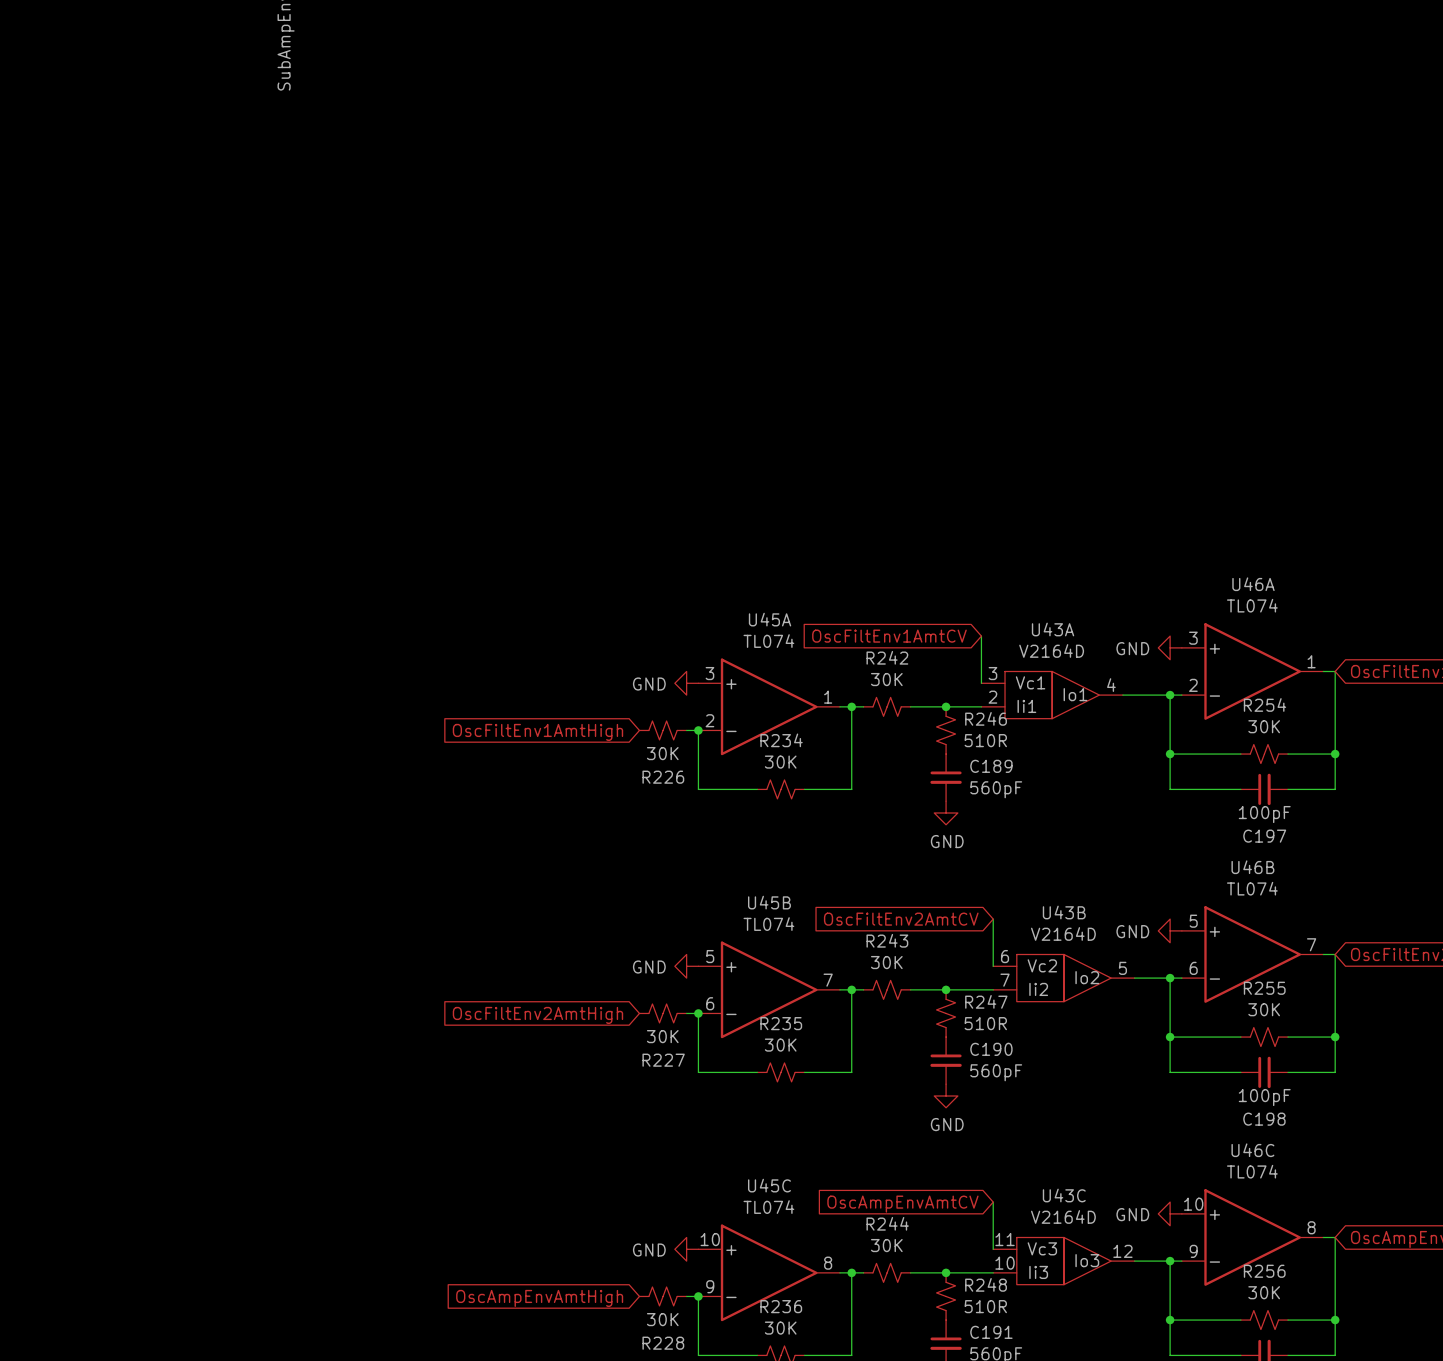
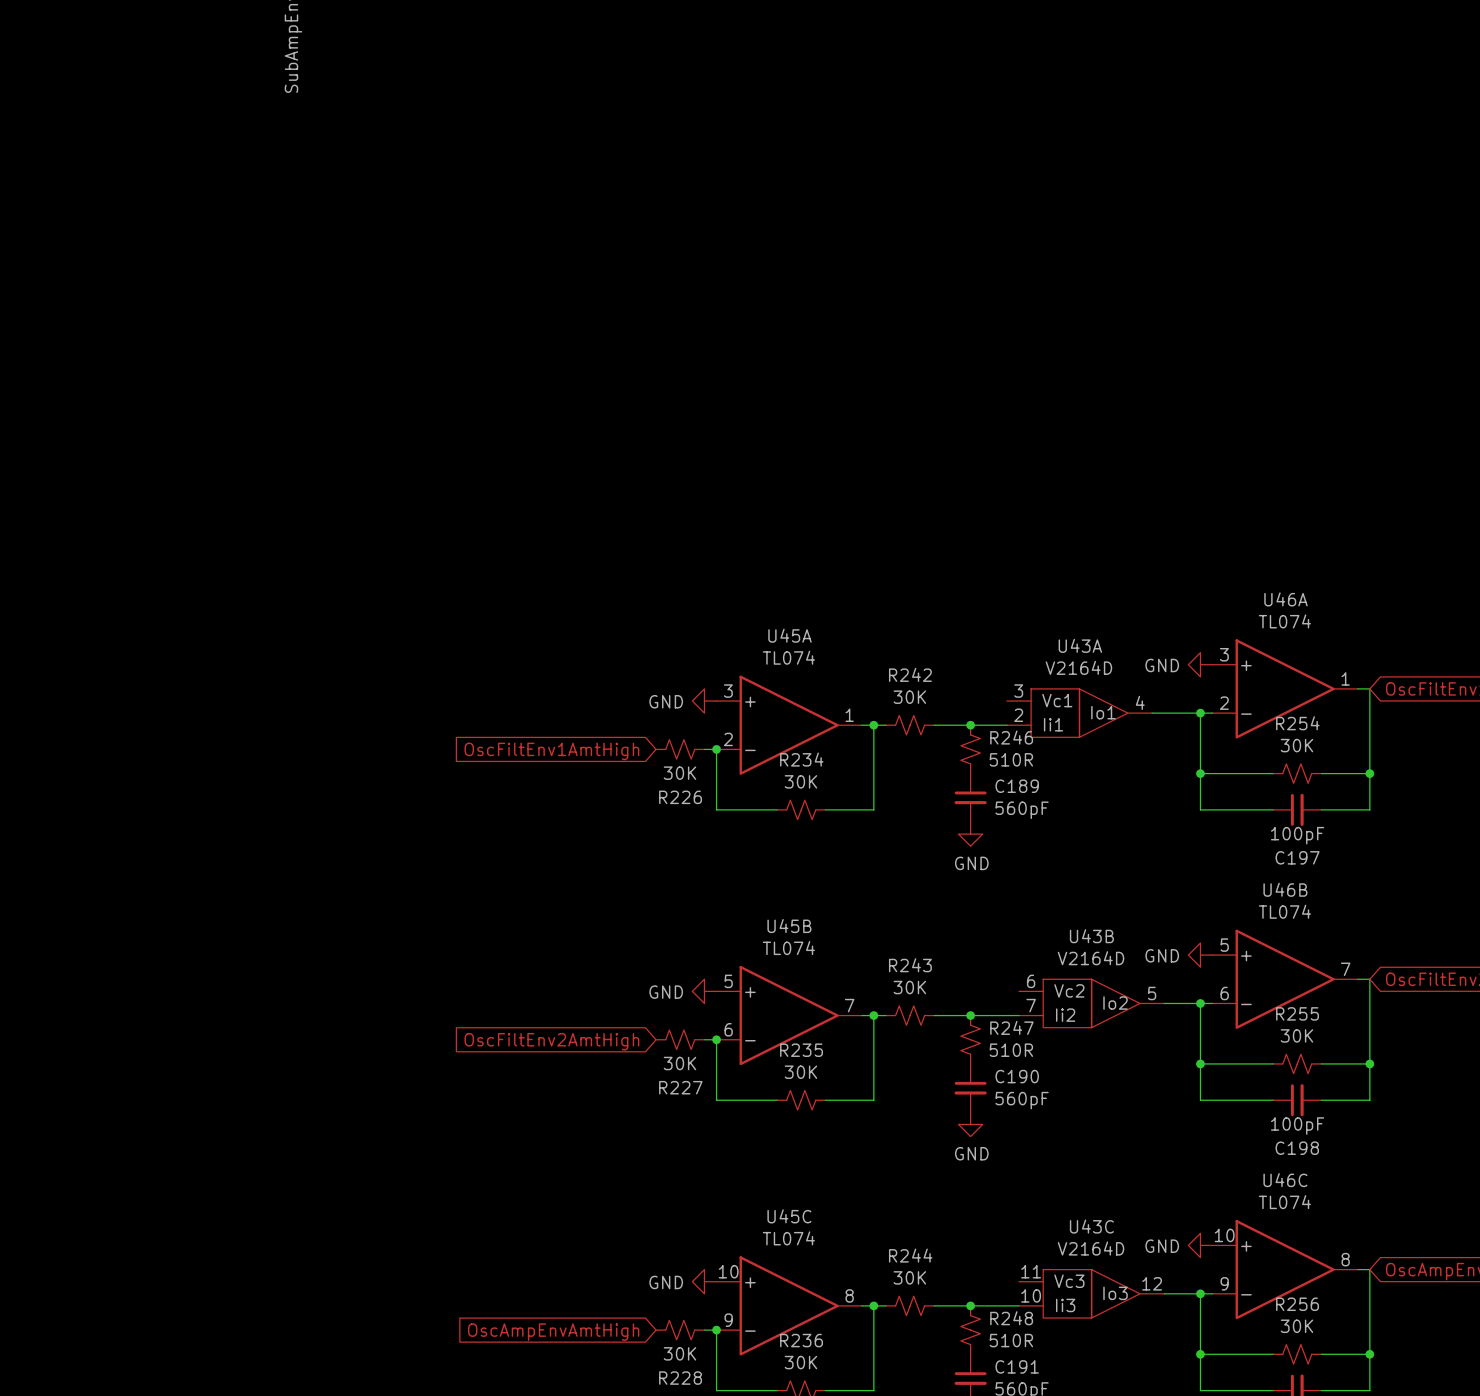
global label: OscFiltEnv1AmtCV (889, 636) -> none
wire: (981, 636) (981, 683) -> none
global label: OscFiltEnv2AmtCV (901, 919) -> none
wire: (993, 919) (993, 966) -> none
wire: (993, 1202) (993, 1249) -> none
global label: OscAmpEnvAmtCV (902, 1204) -> none

